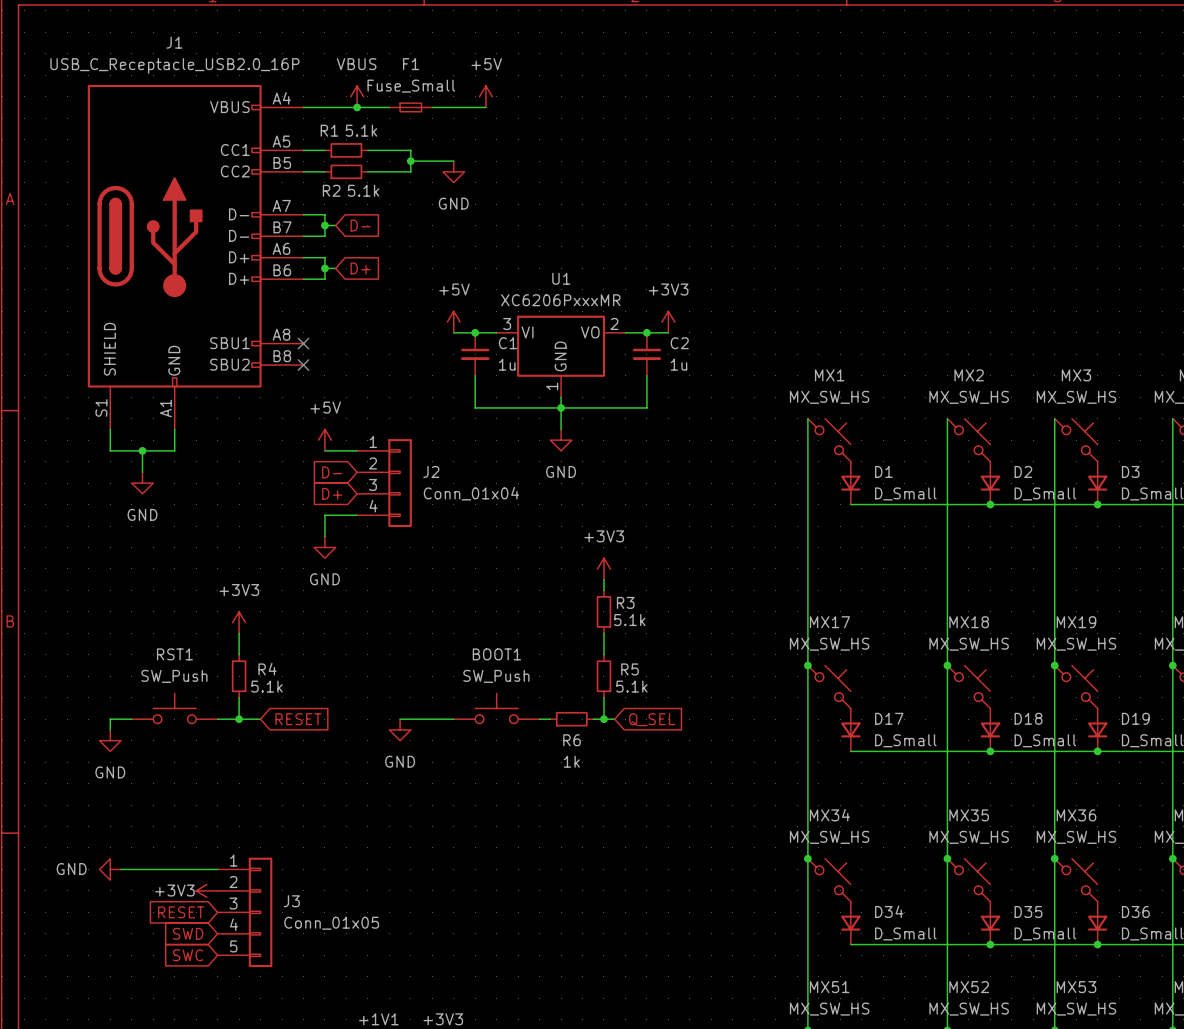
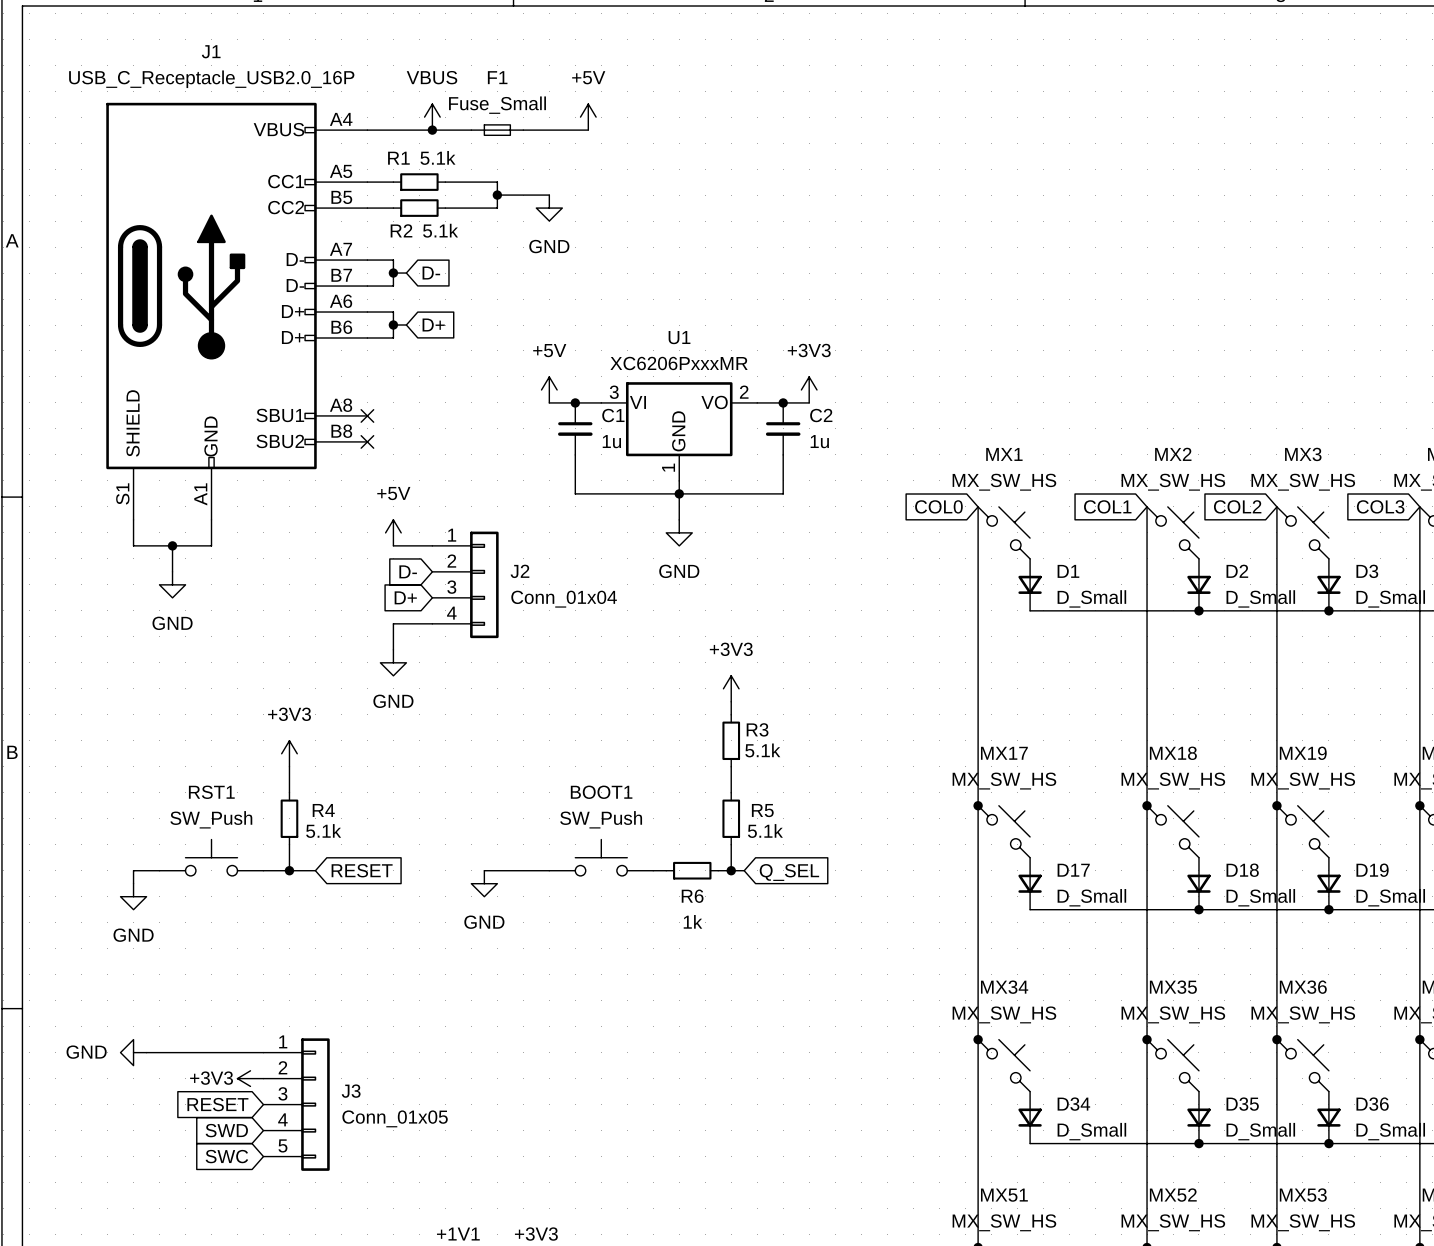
global label: none -> COL0 (938, 506)
global label: none -> COL1 (1107, 506)
global label: none -> COL2 (1237, 506)
global label: none -> COL3 (1380, 506)

